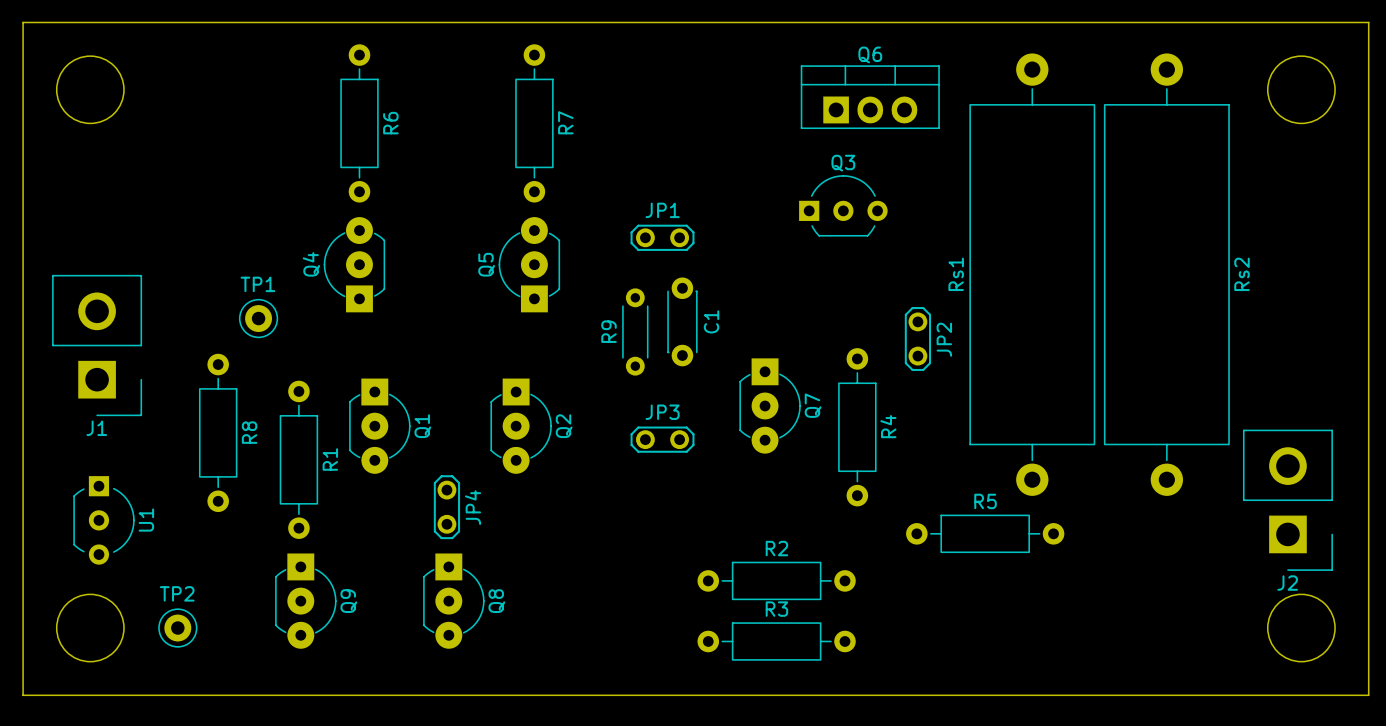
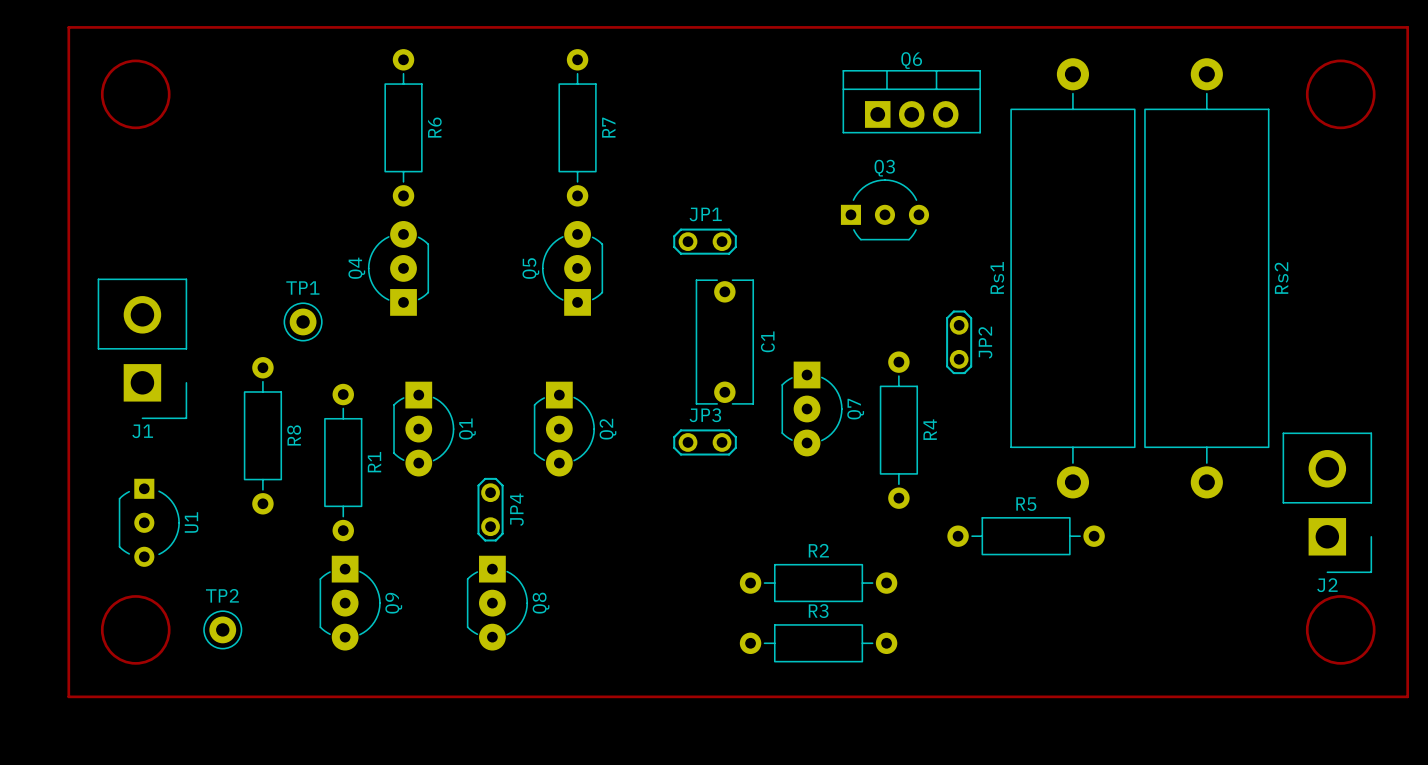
board edge: (23, 22) (1368, 22) (1368, 695) (23, 695) (23, 22) -> none
track: none -> (68, 27) (1407, 27) (1407, 696) (68, 696) (68, 27)
drawing: none -> [100, 59, 171, 130]
drawing: none -> [1305, 59, 1376, 130]
round board edge: [56, 55, 125, 124] -> none
round board edge: [1267, 55, 1336, 124] -> none
C1 footprint: [667, 277, 698, 367] -> [695, 279, 755, 405]
R9: (635, 331) -> none
drawing: none -> [100, 595, 171, 665]
drawing: none -> [1305, 595, 1376, 665]
round board edge: [56, 594, 125, 663] -> none
round board edge: [1267, 594, 1336, 663] -> none

